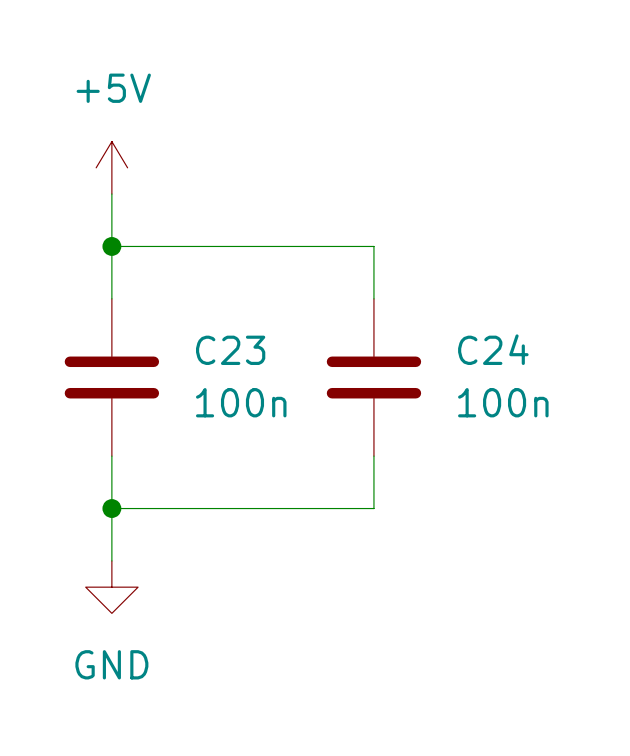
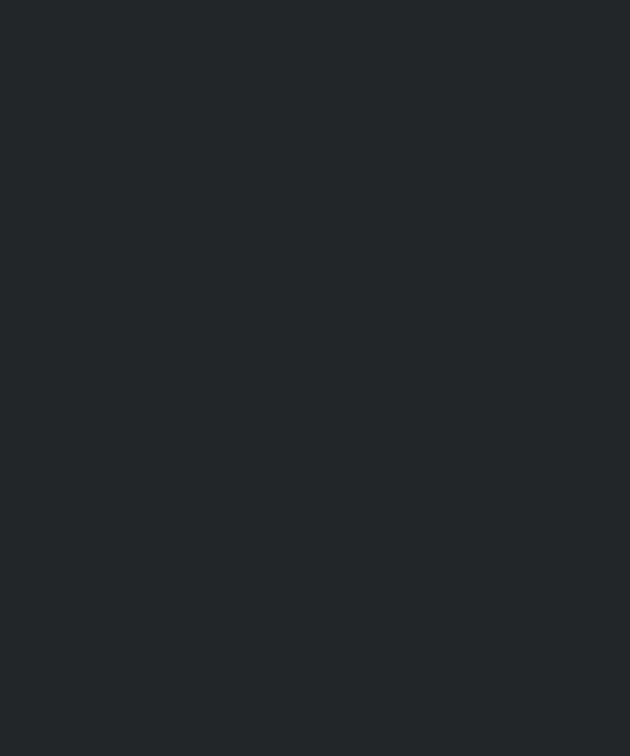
power symbol: +5V (111, 167) -> none
wire: (111, 194) (111, 298) -> none
wire: (111, 246) (373, 246) (373, 298) -> none
junction: (111, 246) -> none
C23: 100n (111, 377) -> none
C24: 100n (373, 377) -> none
wire: (111, 456) (111, 560) -> none
wire: (373, 456) (373, 508) (111, 508) -> none
junction: (111, 508) -> none
power symbol: GND (111, 587) -> none

